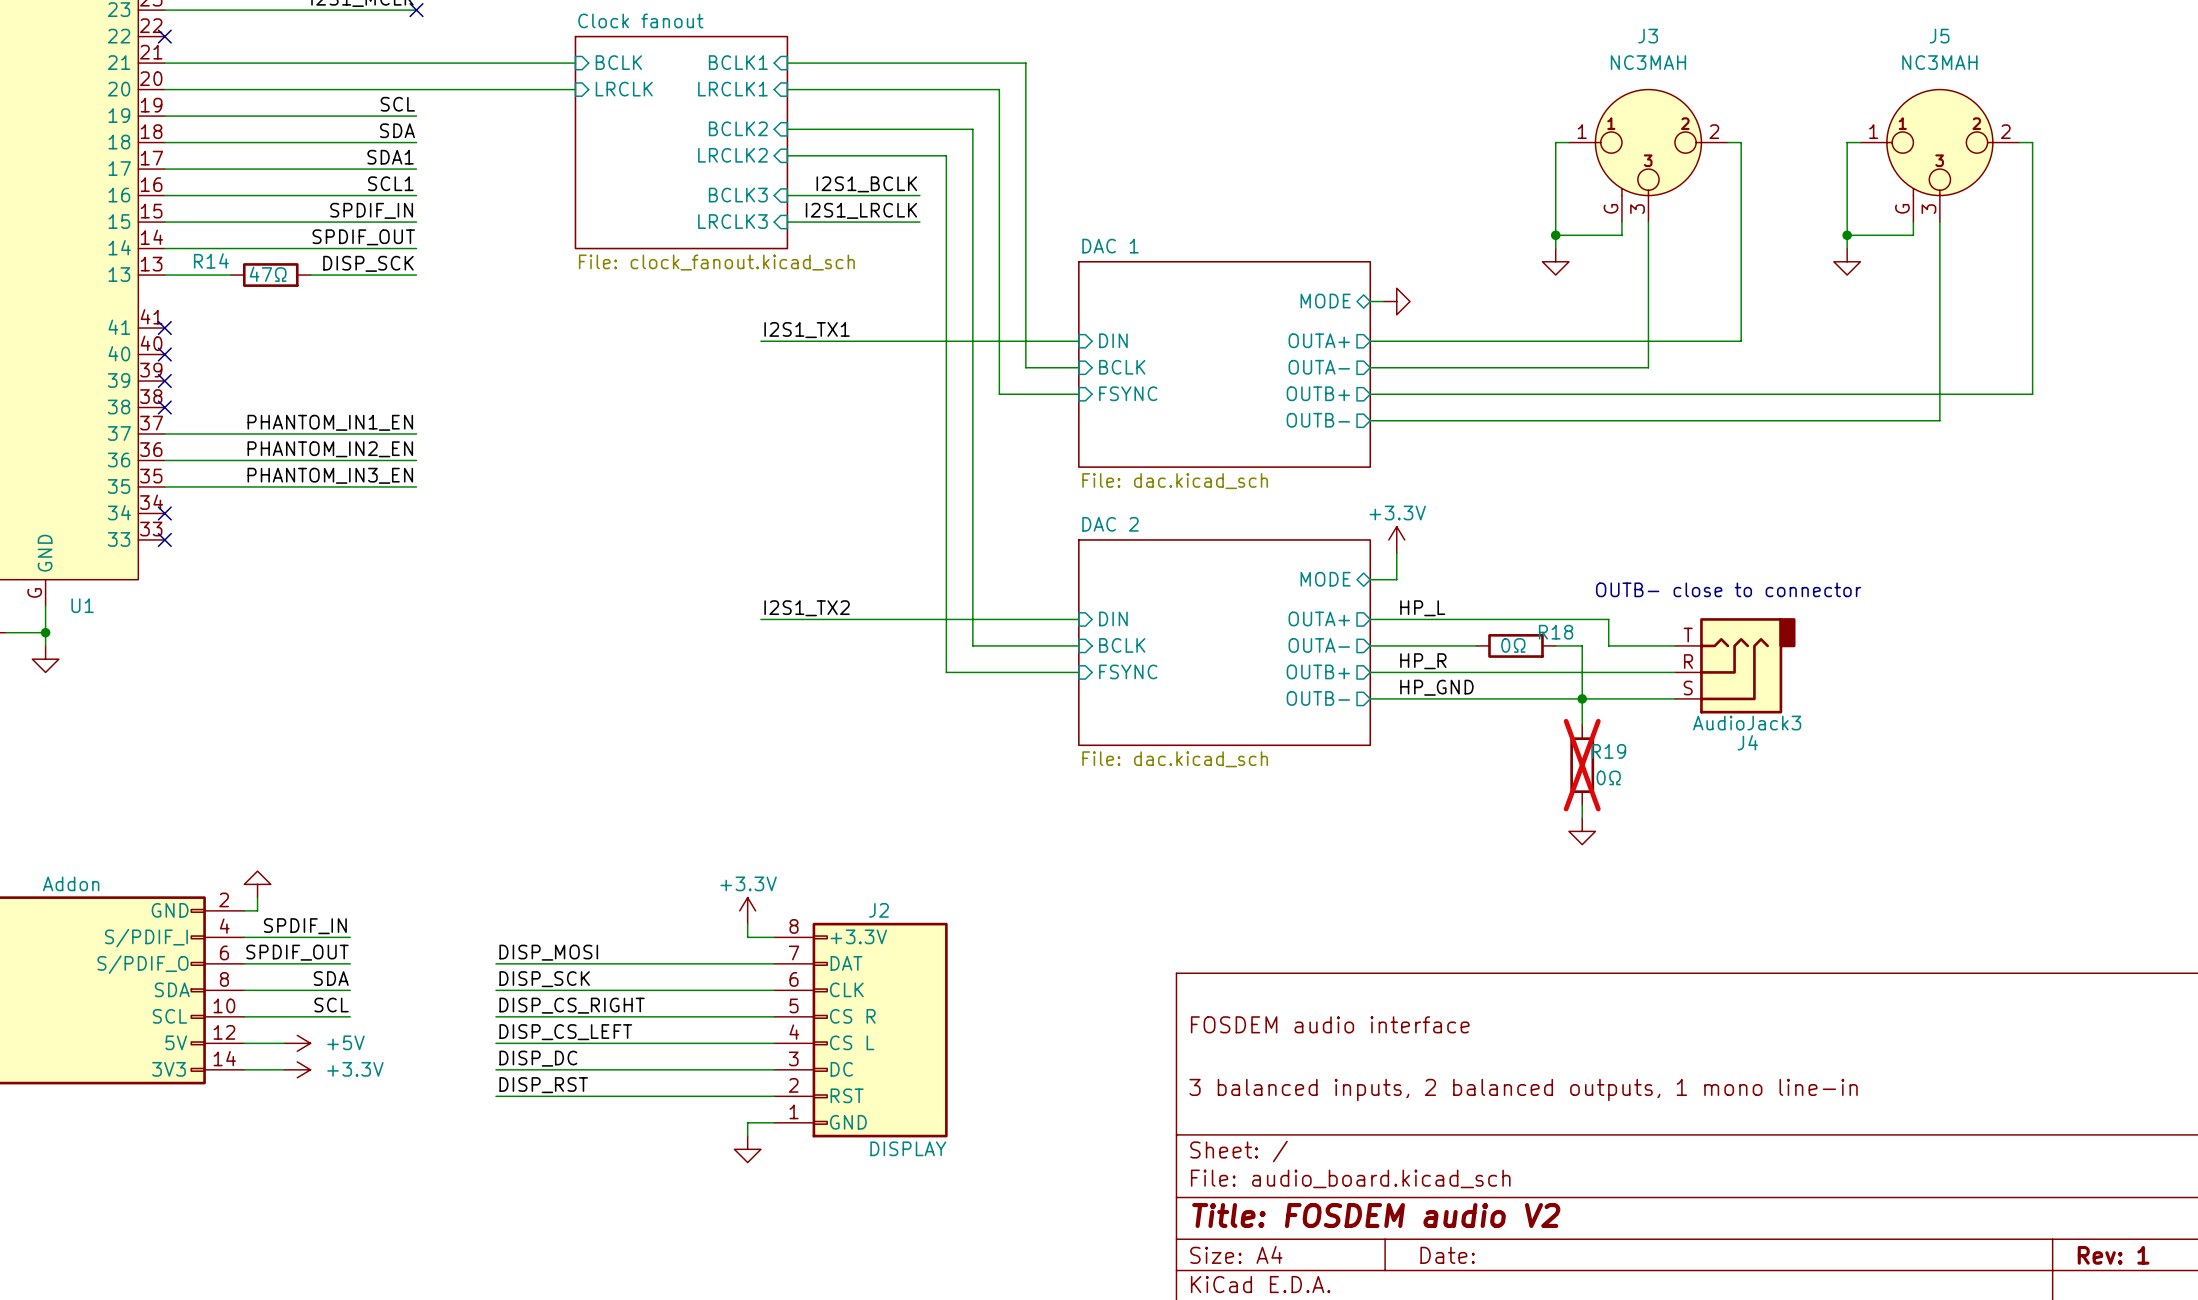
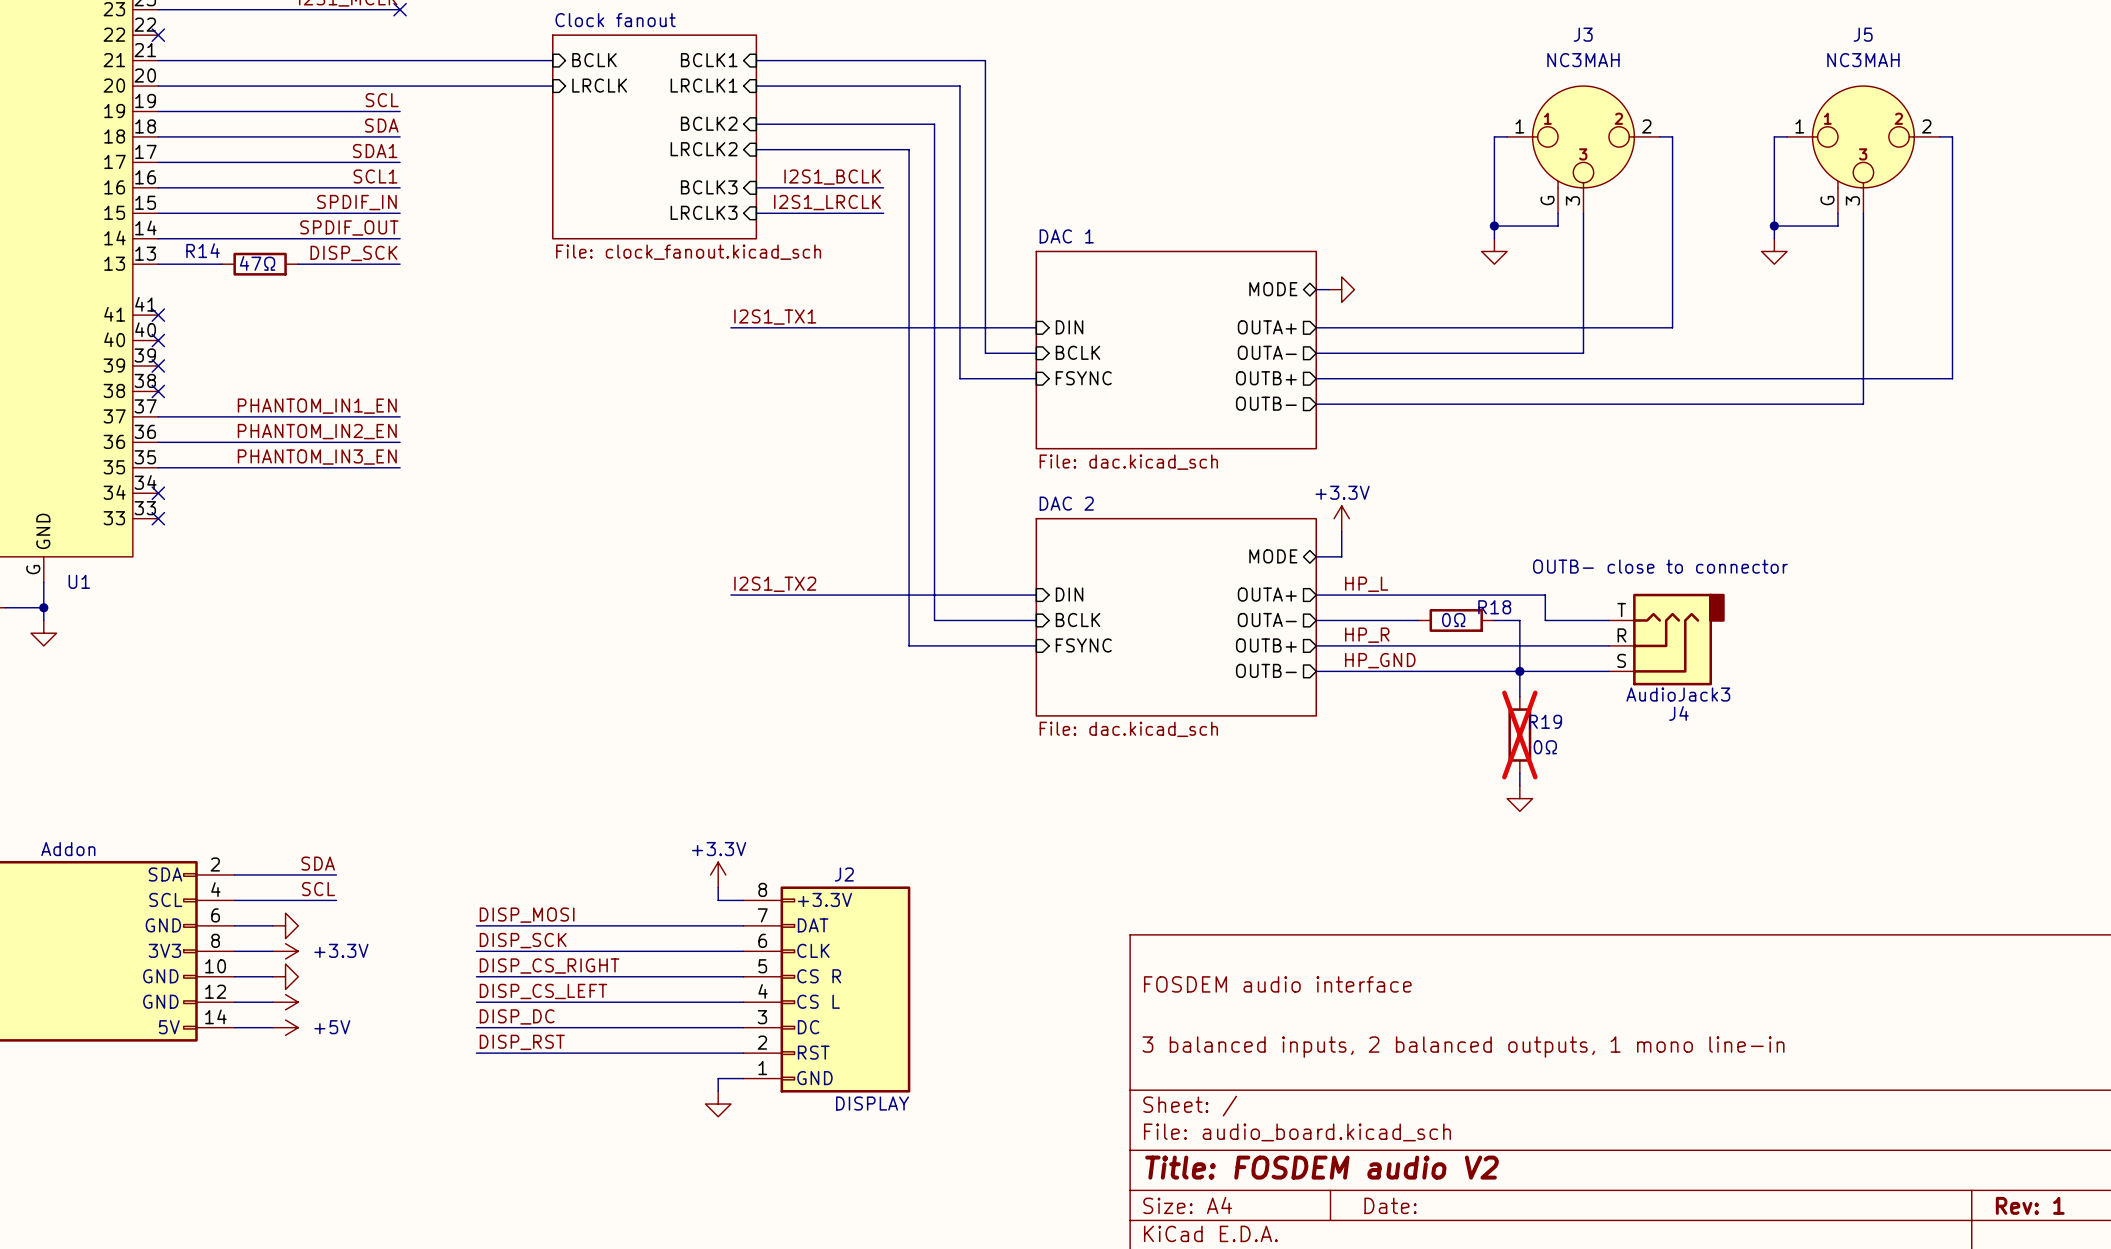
power symbol: (257, 884) -> none
wire: (257, 897) (257, 910) -> (336, 874) (247, 874)
part text: GND (170, 910) -> SDA (165, 874)
label: SPDIF_IN (305, 926) -> SCL (318, 889)
part text: S/PDIF_I (146, 938) -> SCL (165, 899)
label: SPDIF_OUT (297, 952) -> none
wire: (284, 963) (350, 963) -> none
power symbol: none -> (285, 925)
part text: S/PDIF_O (142, 964) -> GND (163, 925)
label position: SDA (331, 978) -> SDA (318, 863)
part text: SDA (172, 989) -> 3V3 (164, 950)
wire: (284, 990) (350, 990) -> none
power symbol: none -> +3.3V (285, 951)
label: SCL (331, 1005) -> none
part text: SCL (169, 1016) -> GND (160, 976)
wire: (284, 1016) (350, 1016) -> none
power symbol: none -> (285, 976)
part text: 5V (176, 1042) -> GND (160, 1001)
power symbol text: +5V (345, 1042) -> none
part text: 3V3 (169, 1069) -> 5V (169, 1027)
power symbol: +3.3V (297, 1069) -> +5V (285, 1027)

